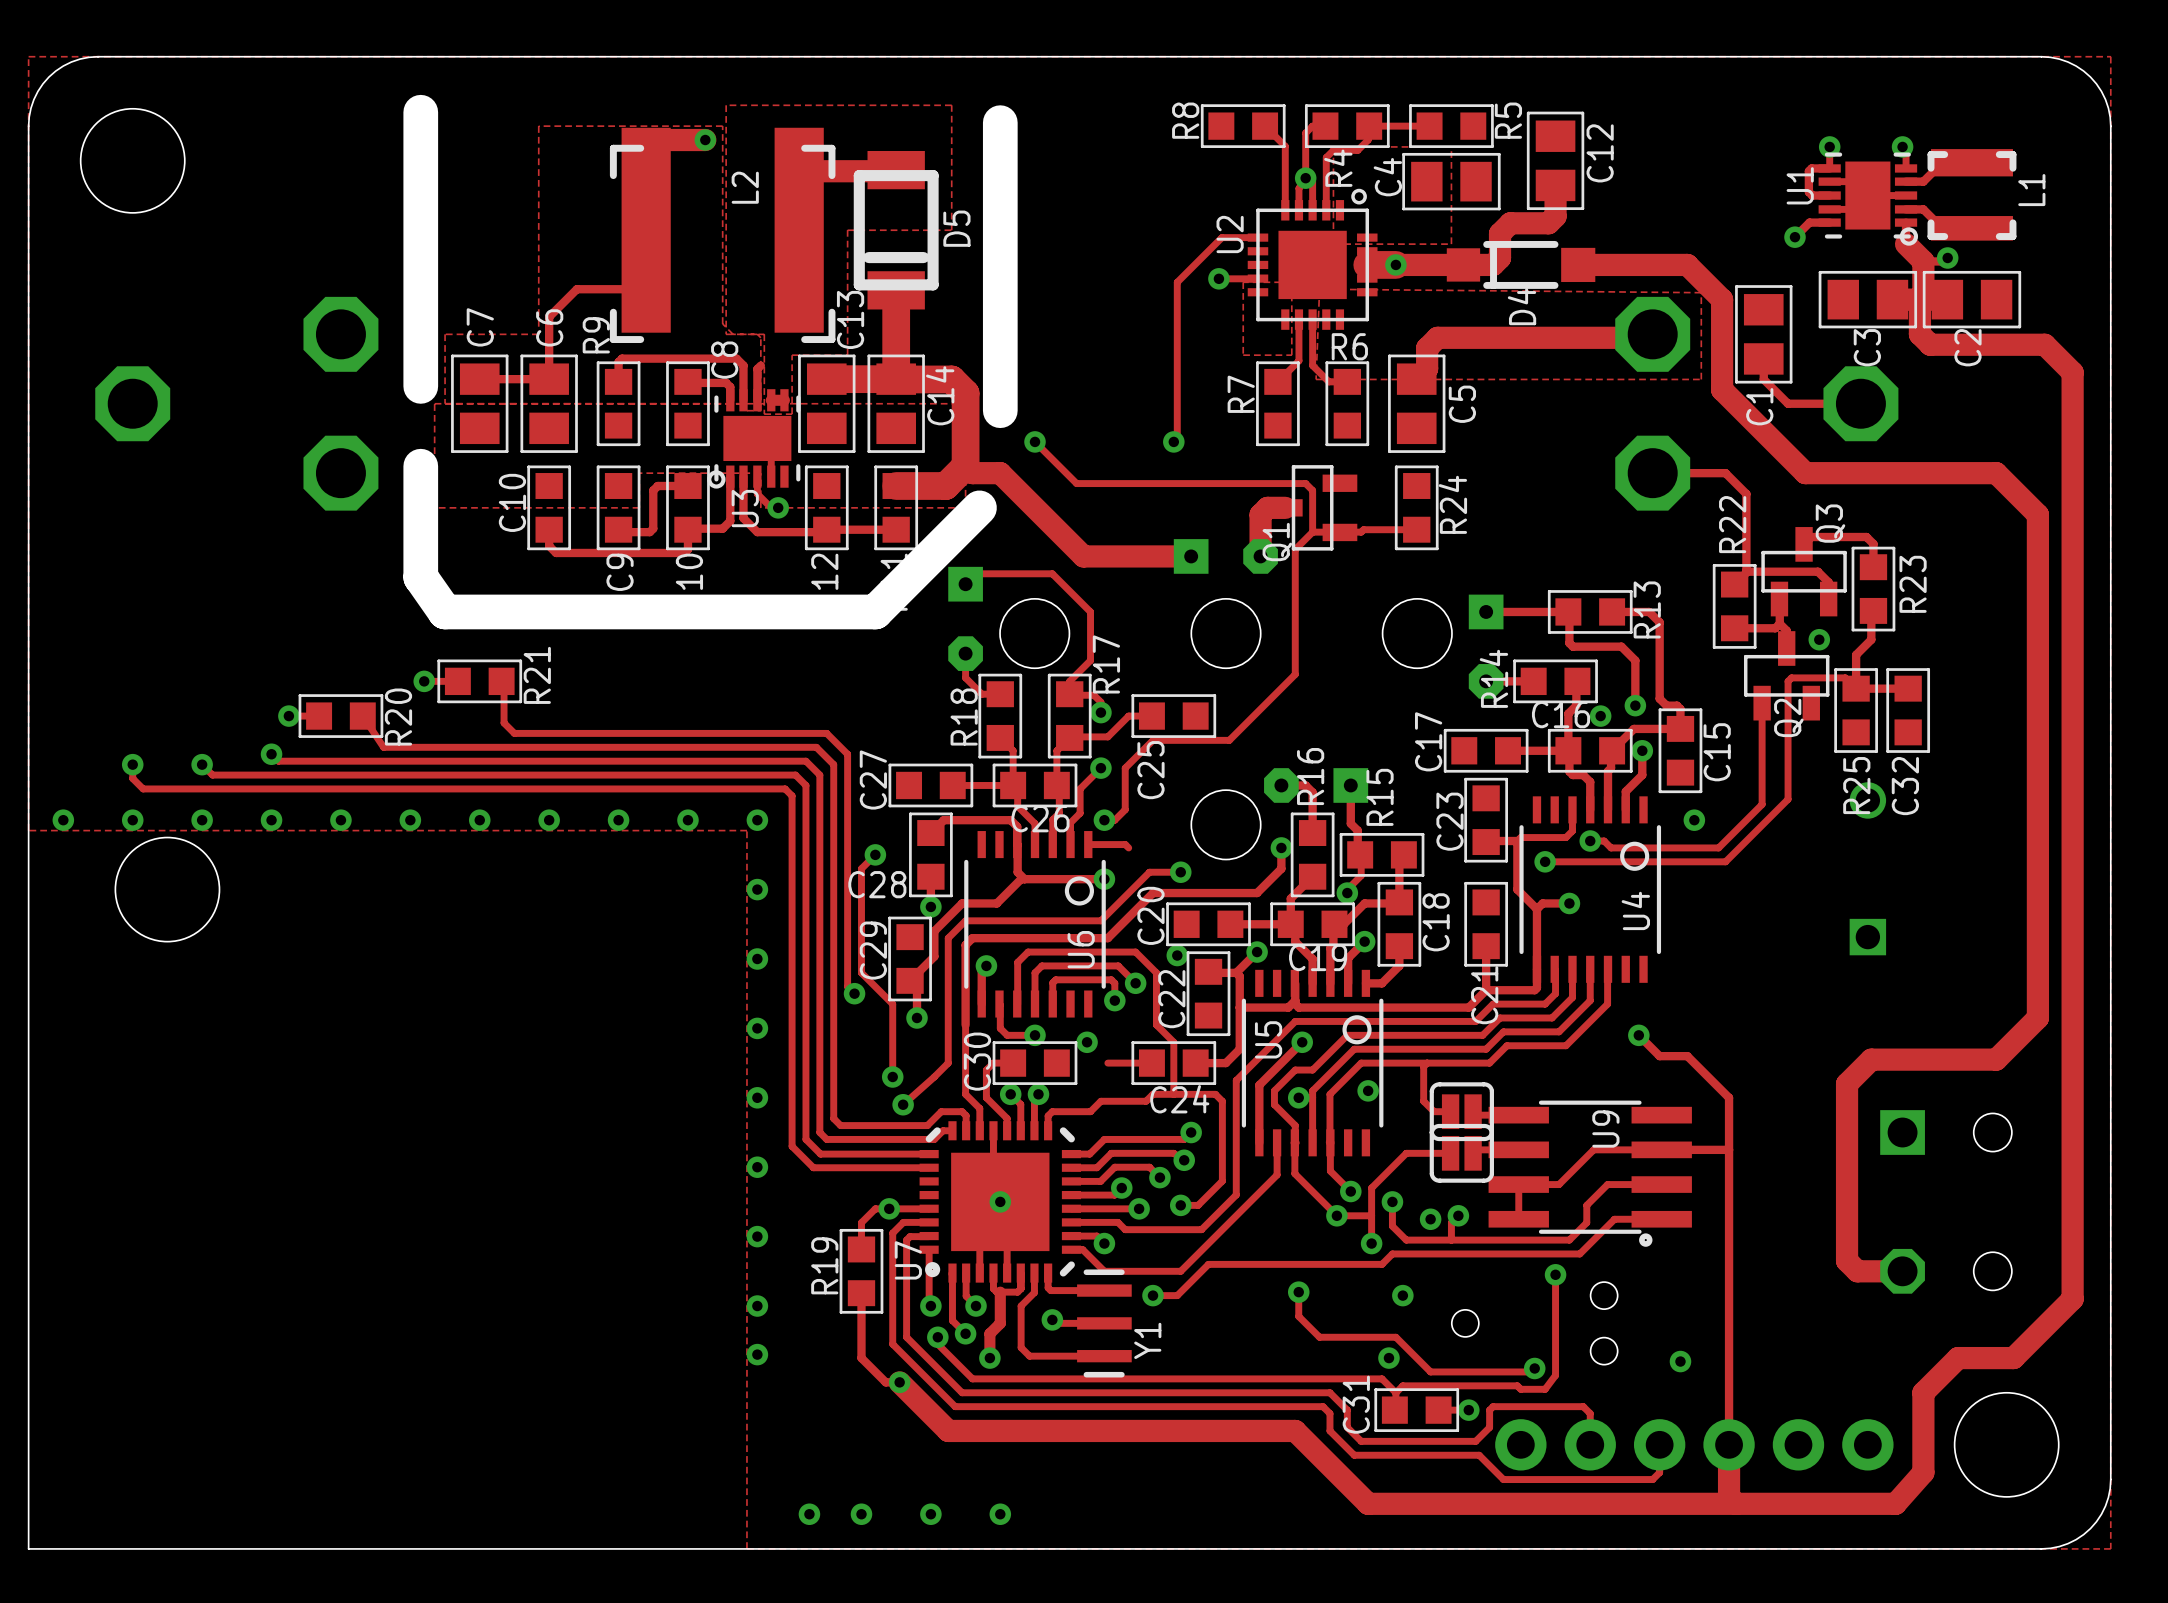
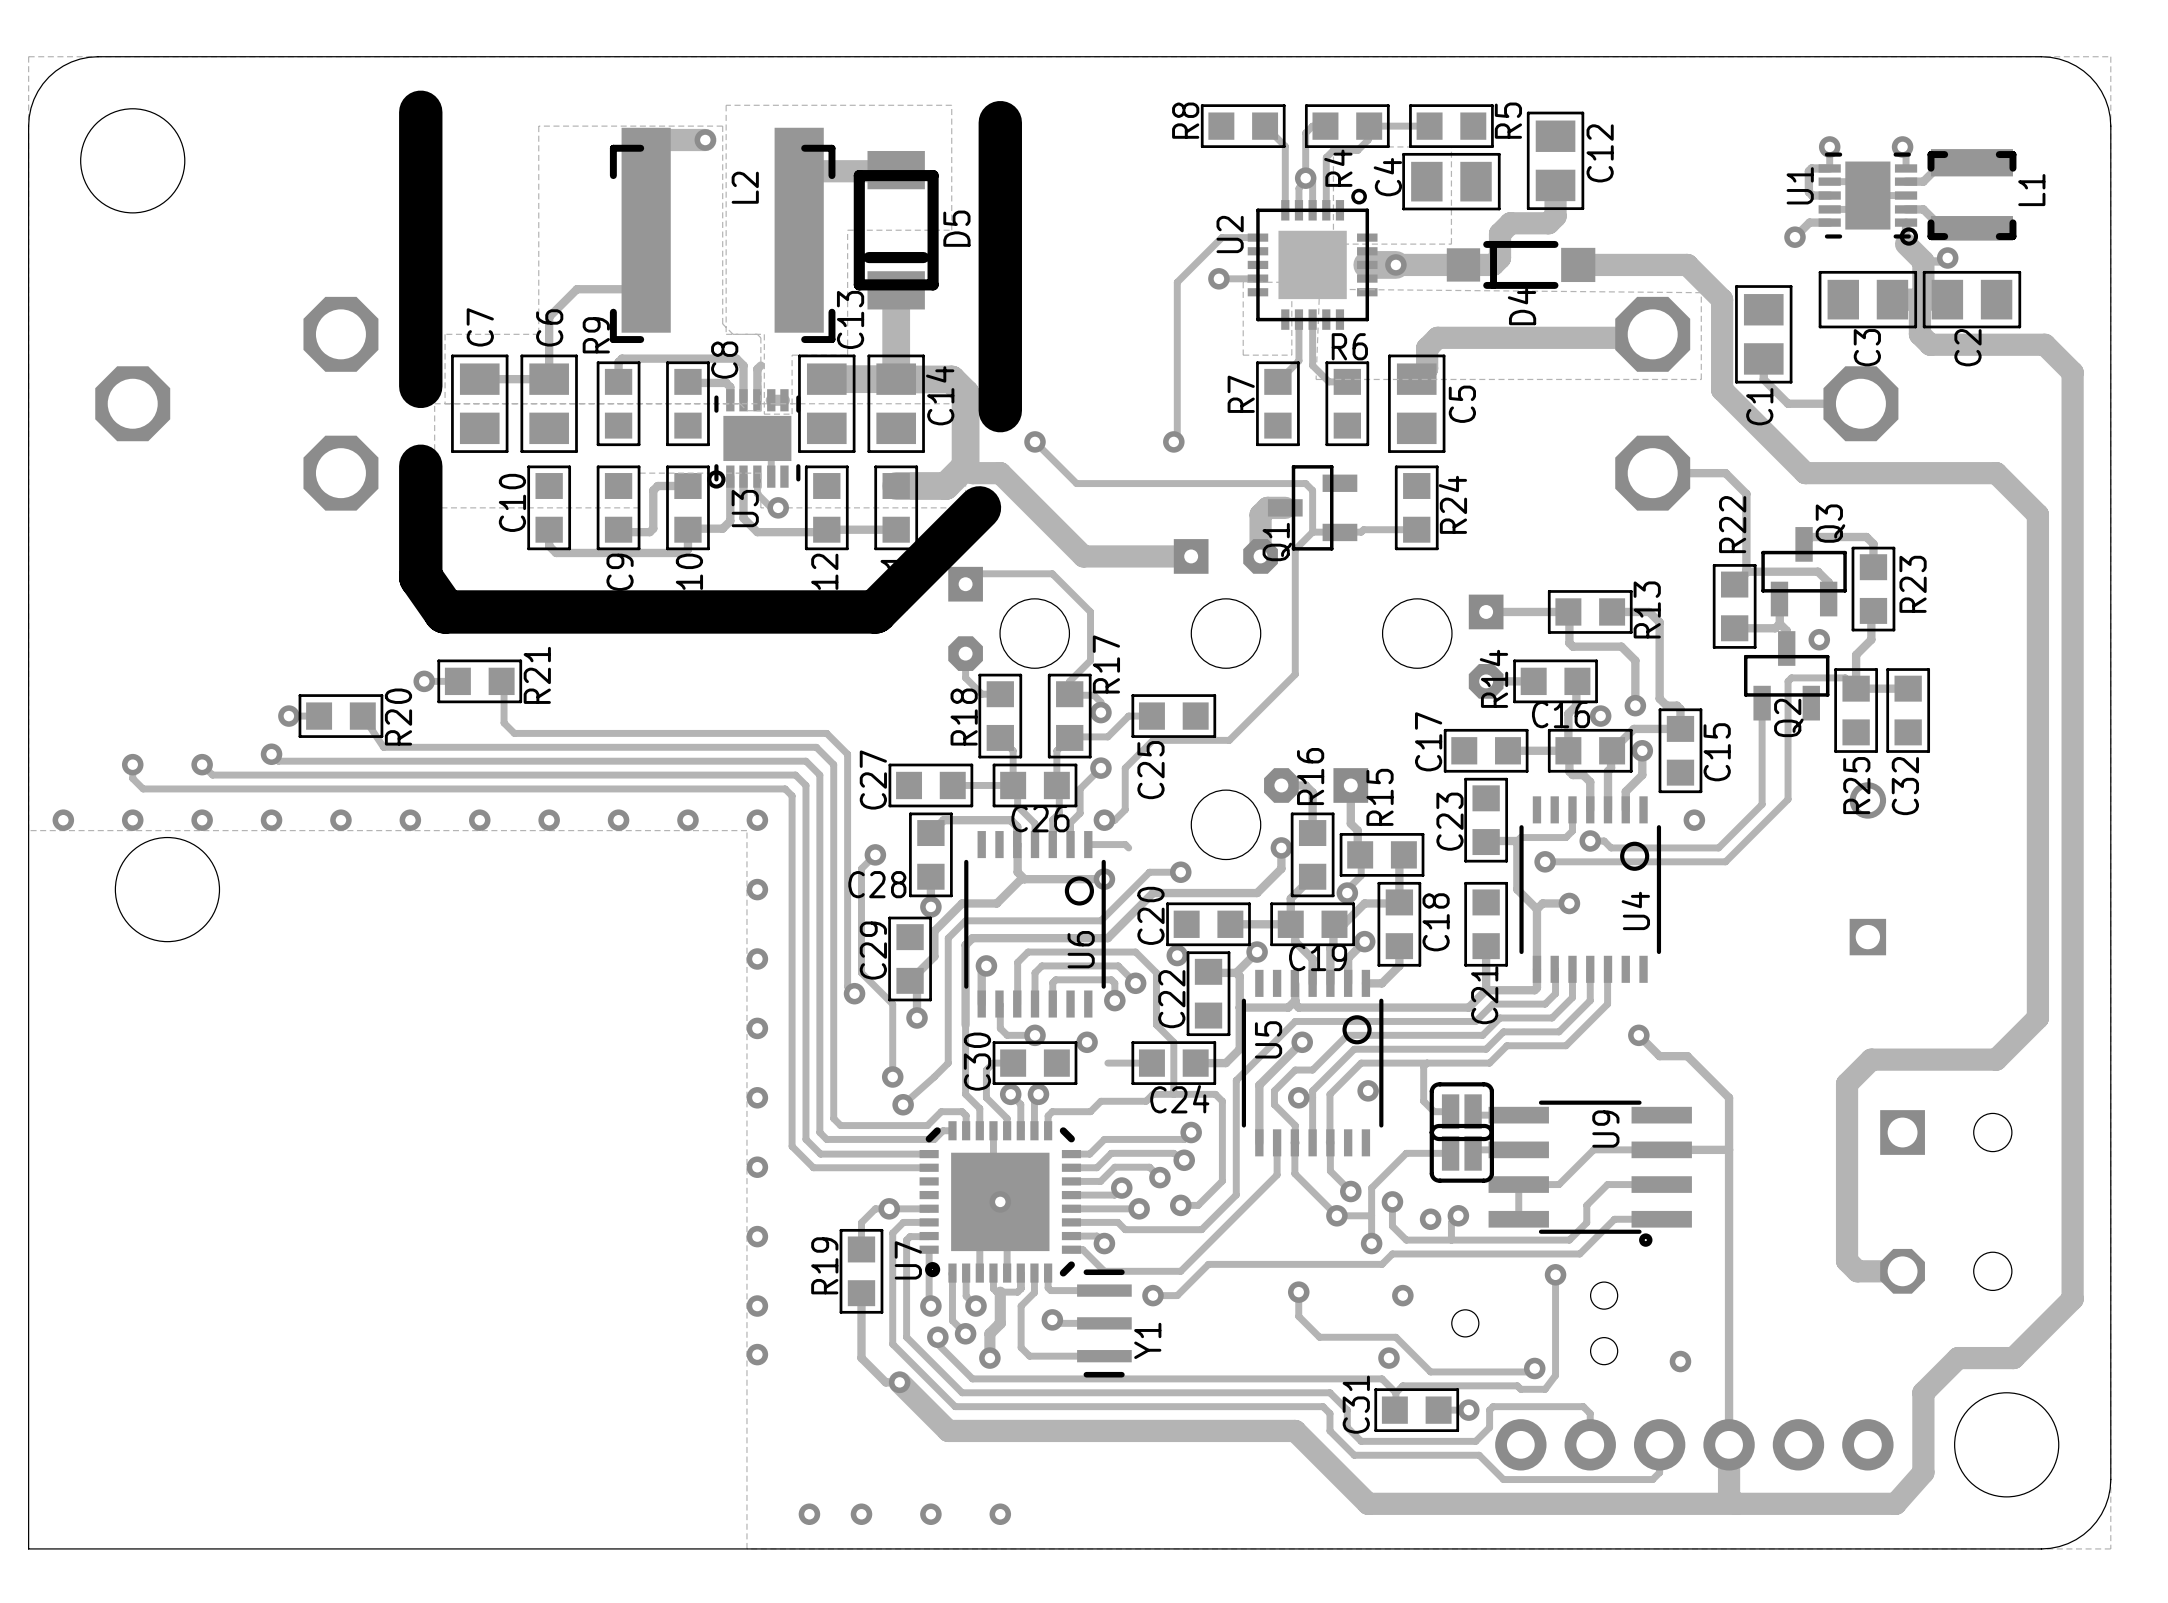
board edge width: thin (420, 112) (420, 386) -> thick (420, 112) (420, 386)
board edge width: thin (1000, 122) (1000, 410) -> thick (1000, 122) (1000, 410)
board edge width: thin (420, 466) (420, 577) (445, 611) (875, 611) (979, 507) -> thick (420, 466) (420, 577) (445, 611) (875, 611) (979, 507)

